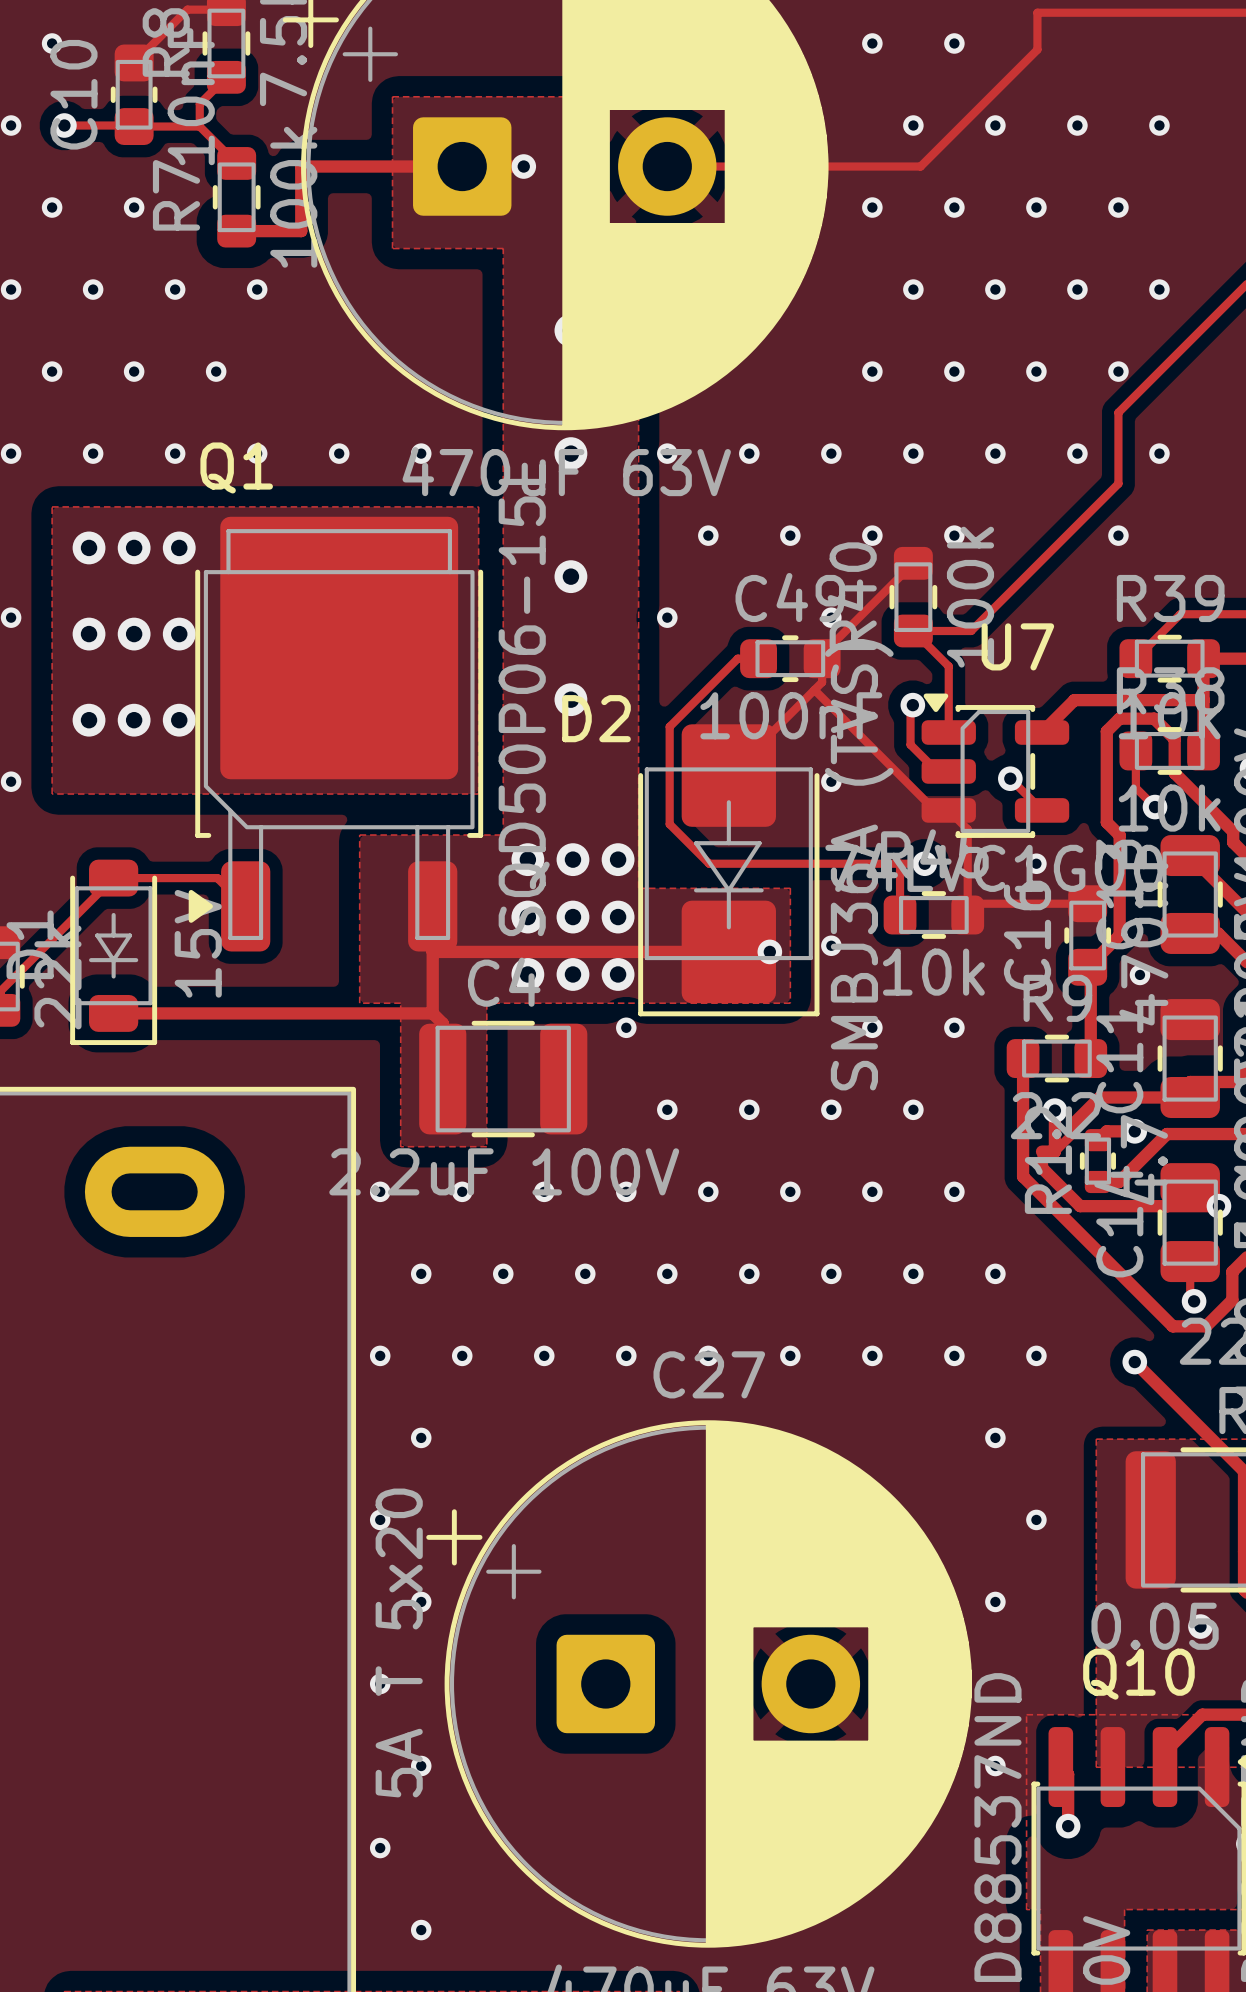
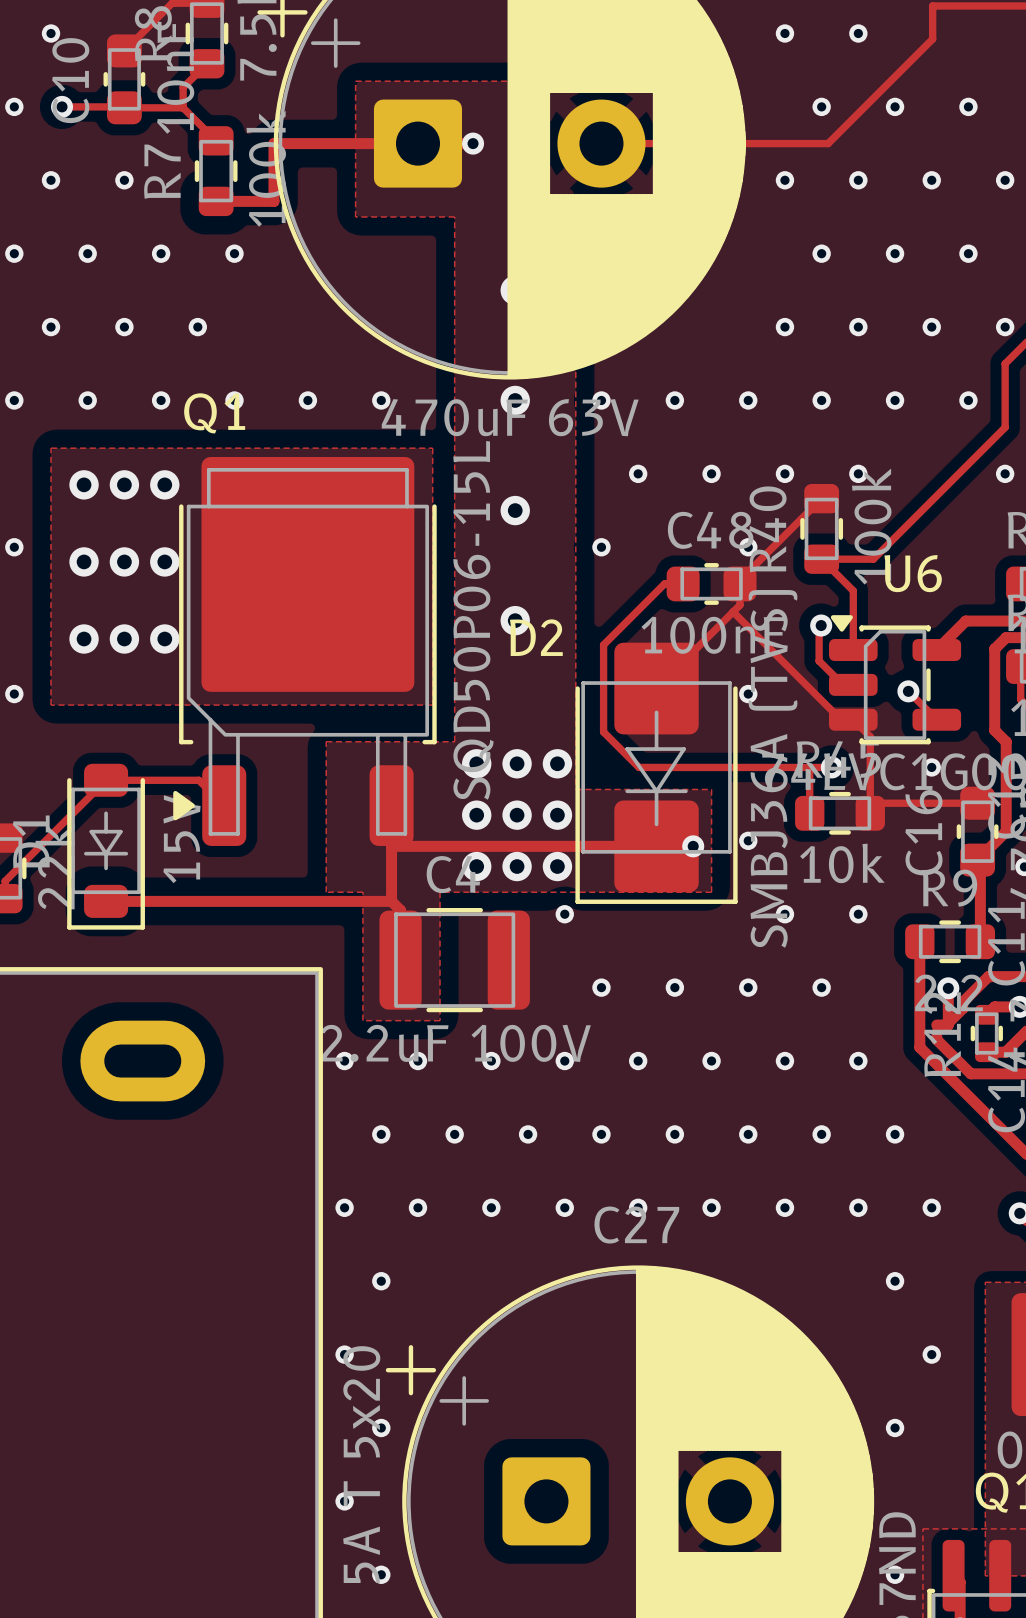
C49 name: C49 (790, 597) -> C48 (710, 530)
U7 name: U7 (1017, 646) -> U6 (913, 573)

